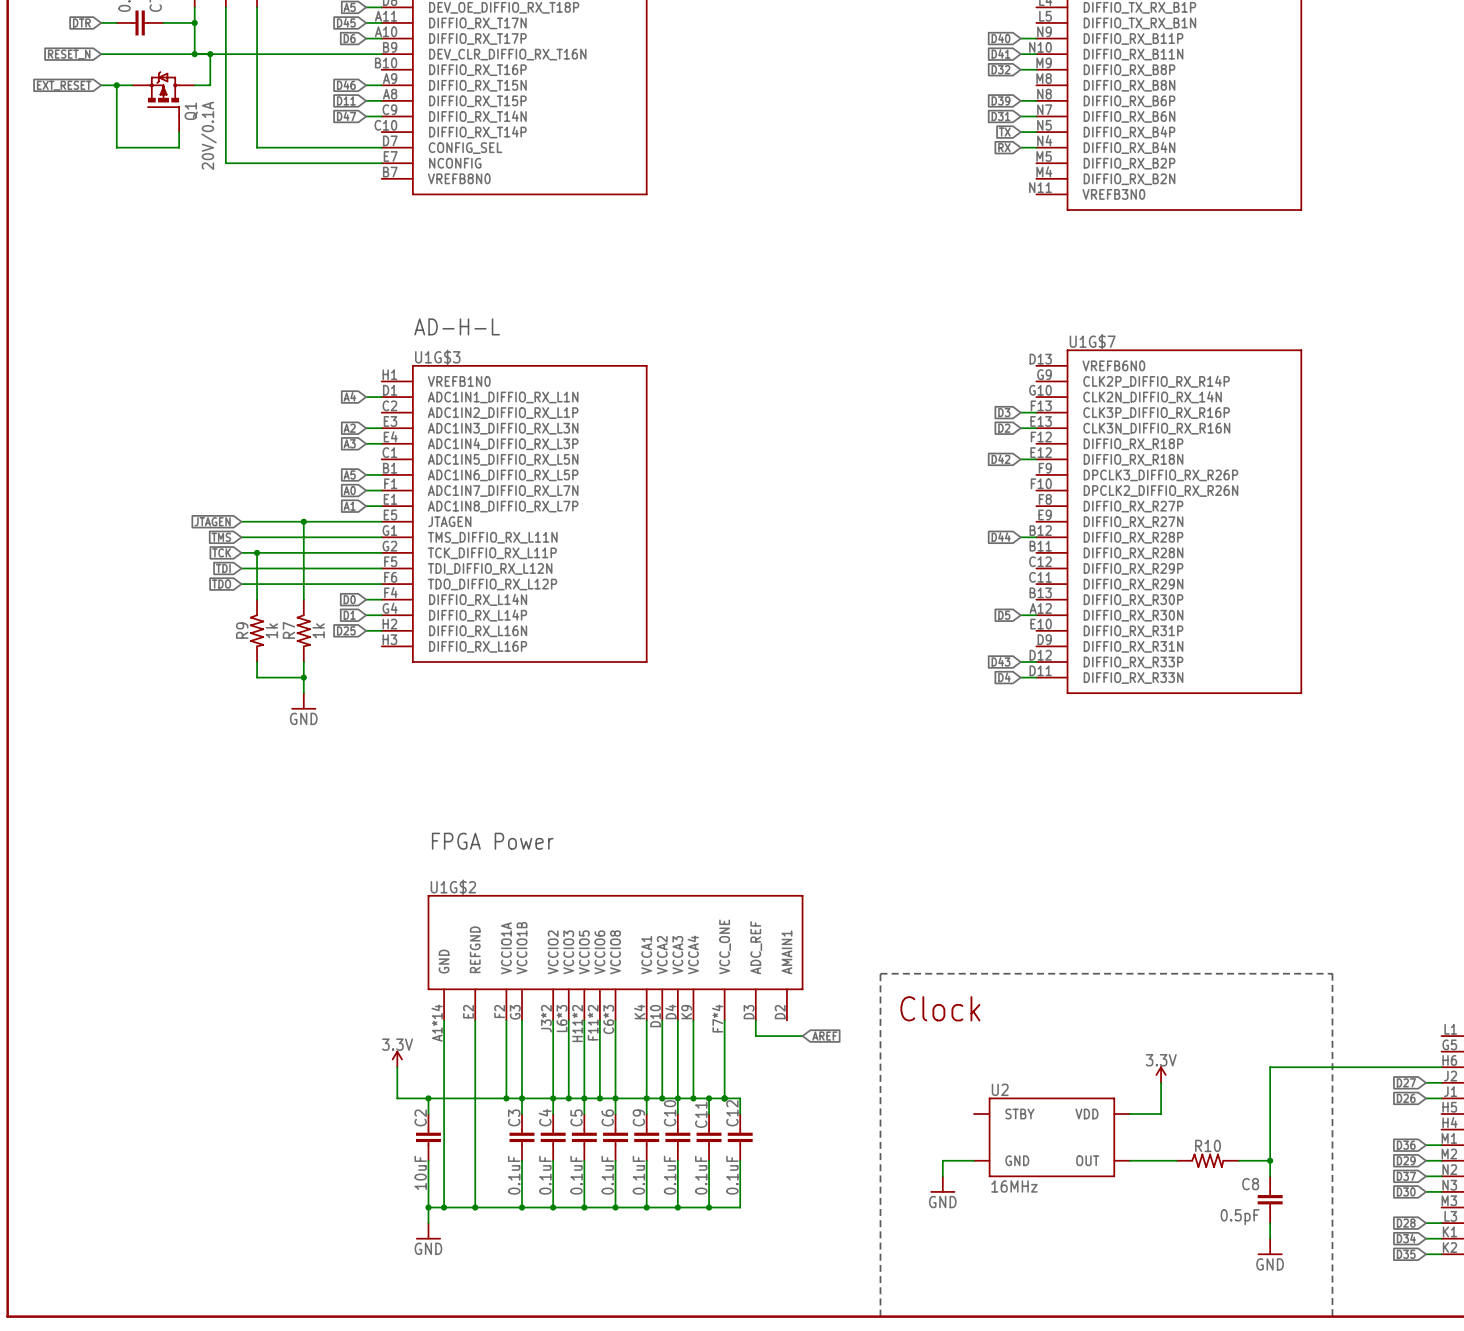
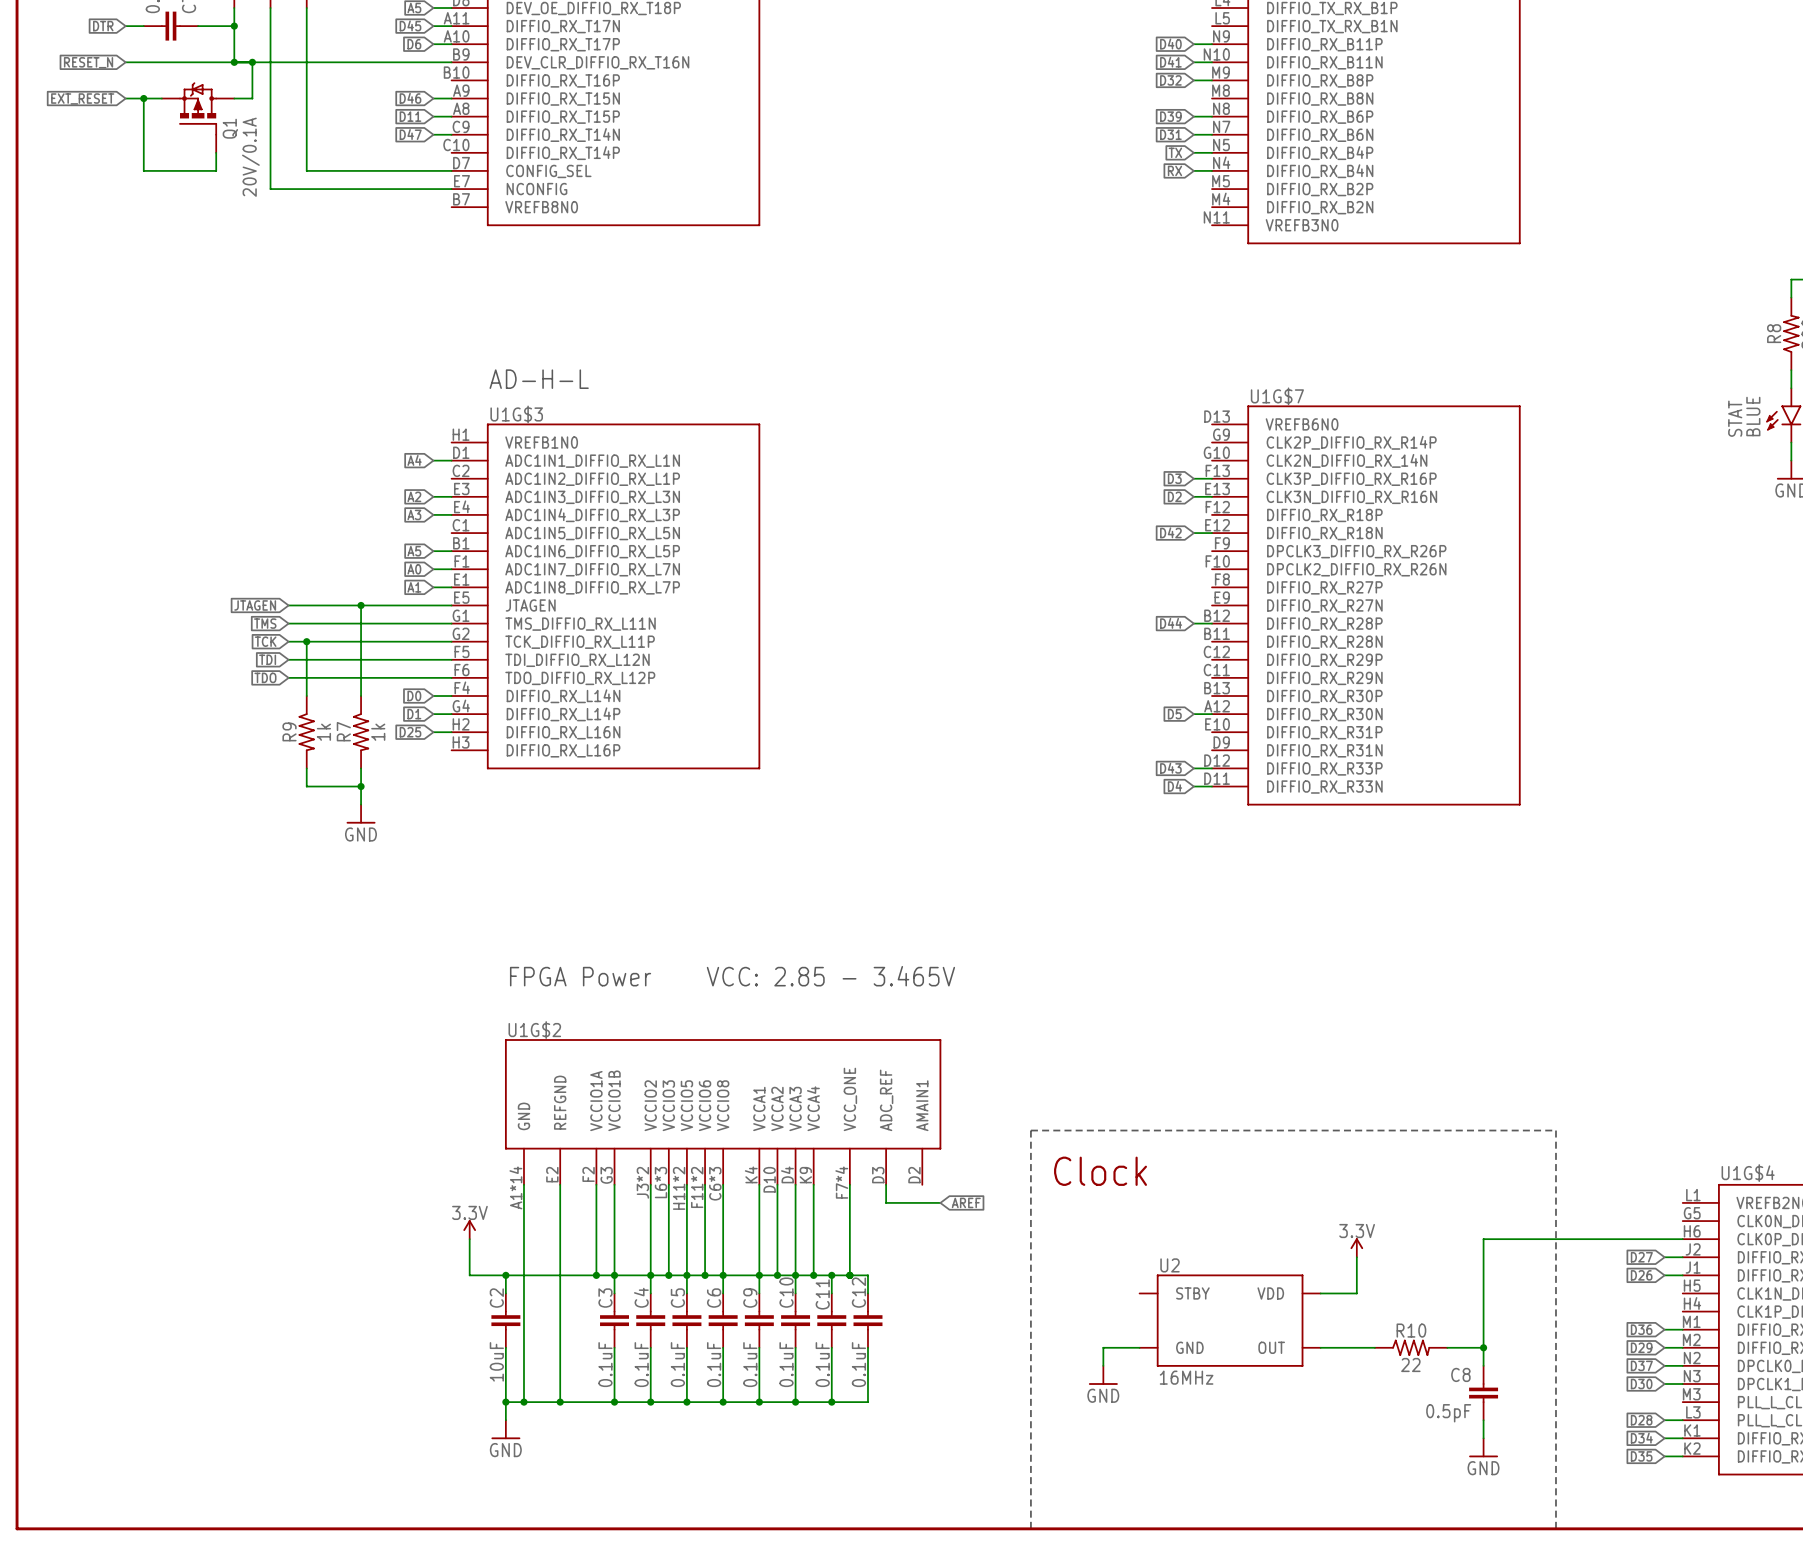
text: none -> VCC: 2.85 - 3.465V (830, 976)
R10 value: none -> 22 (1410, 1364)

